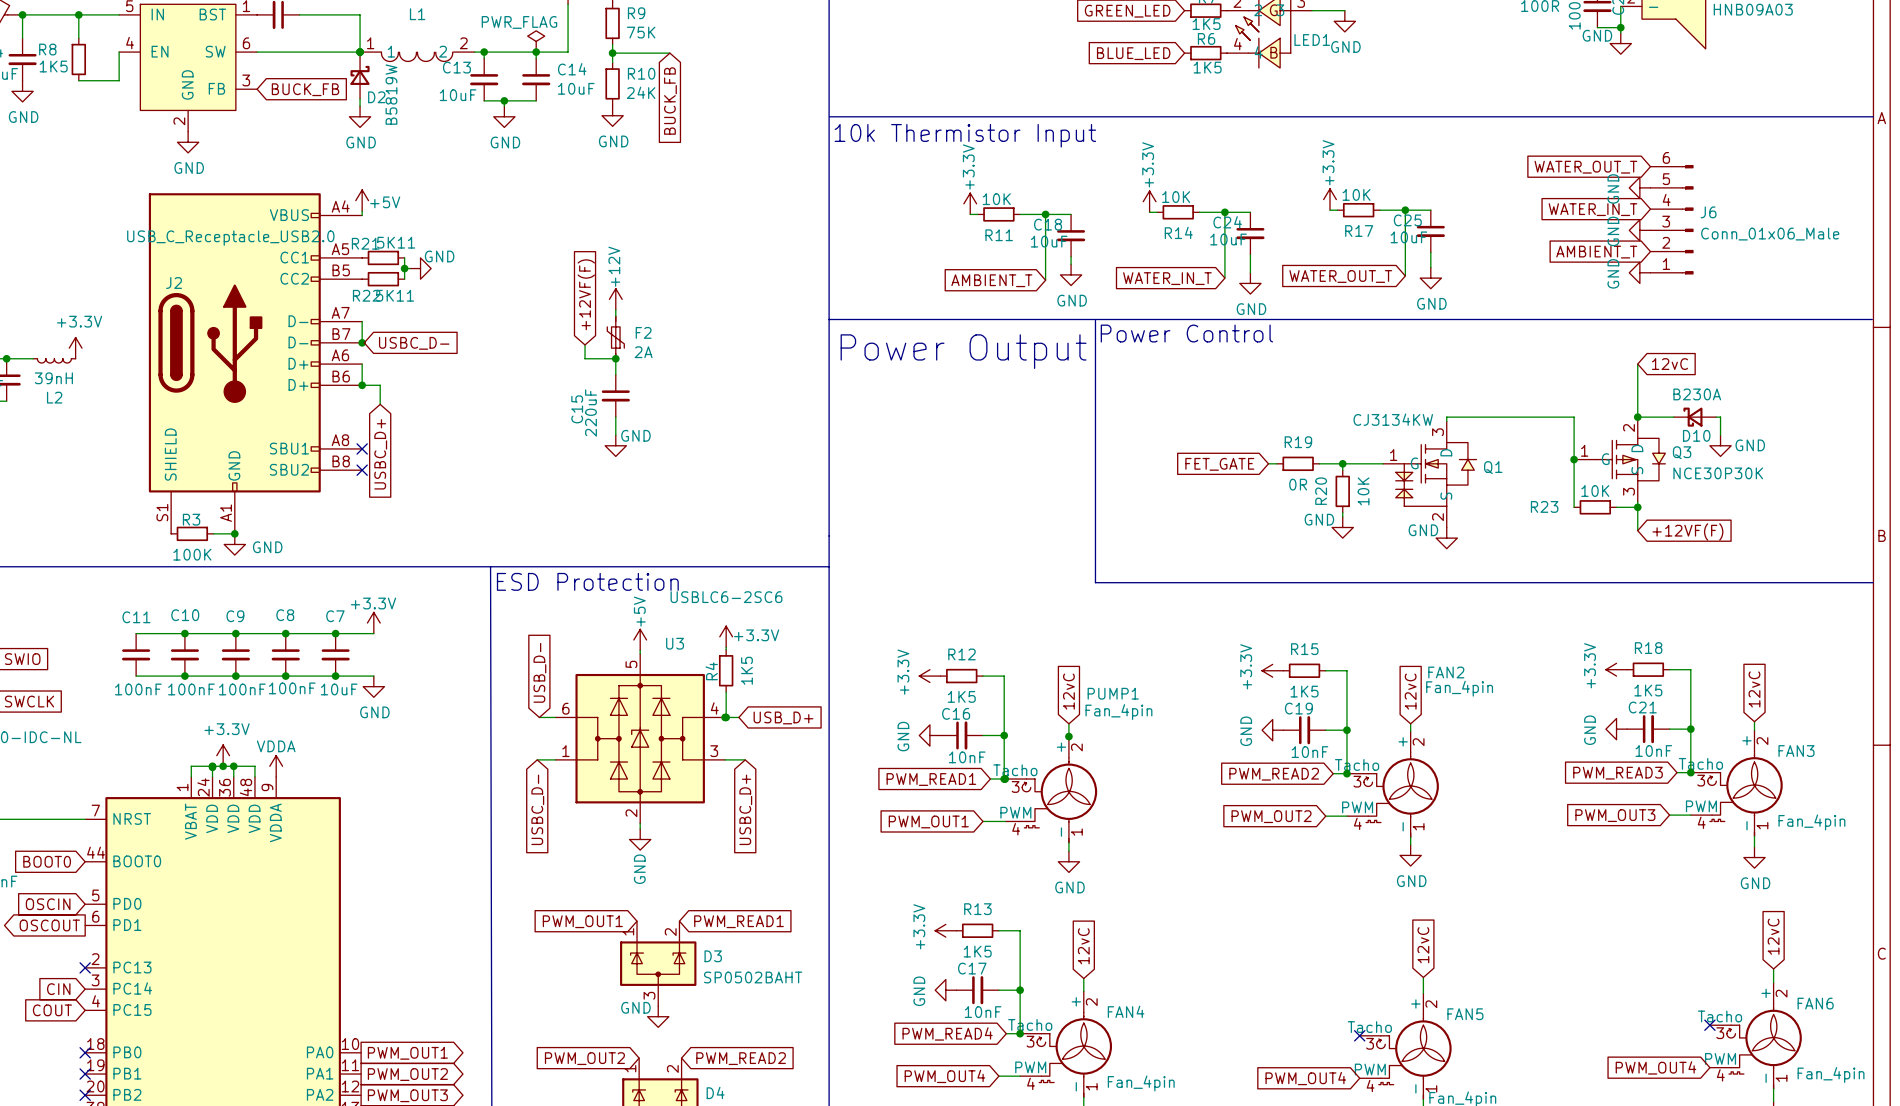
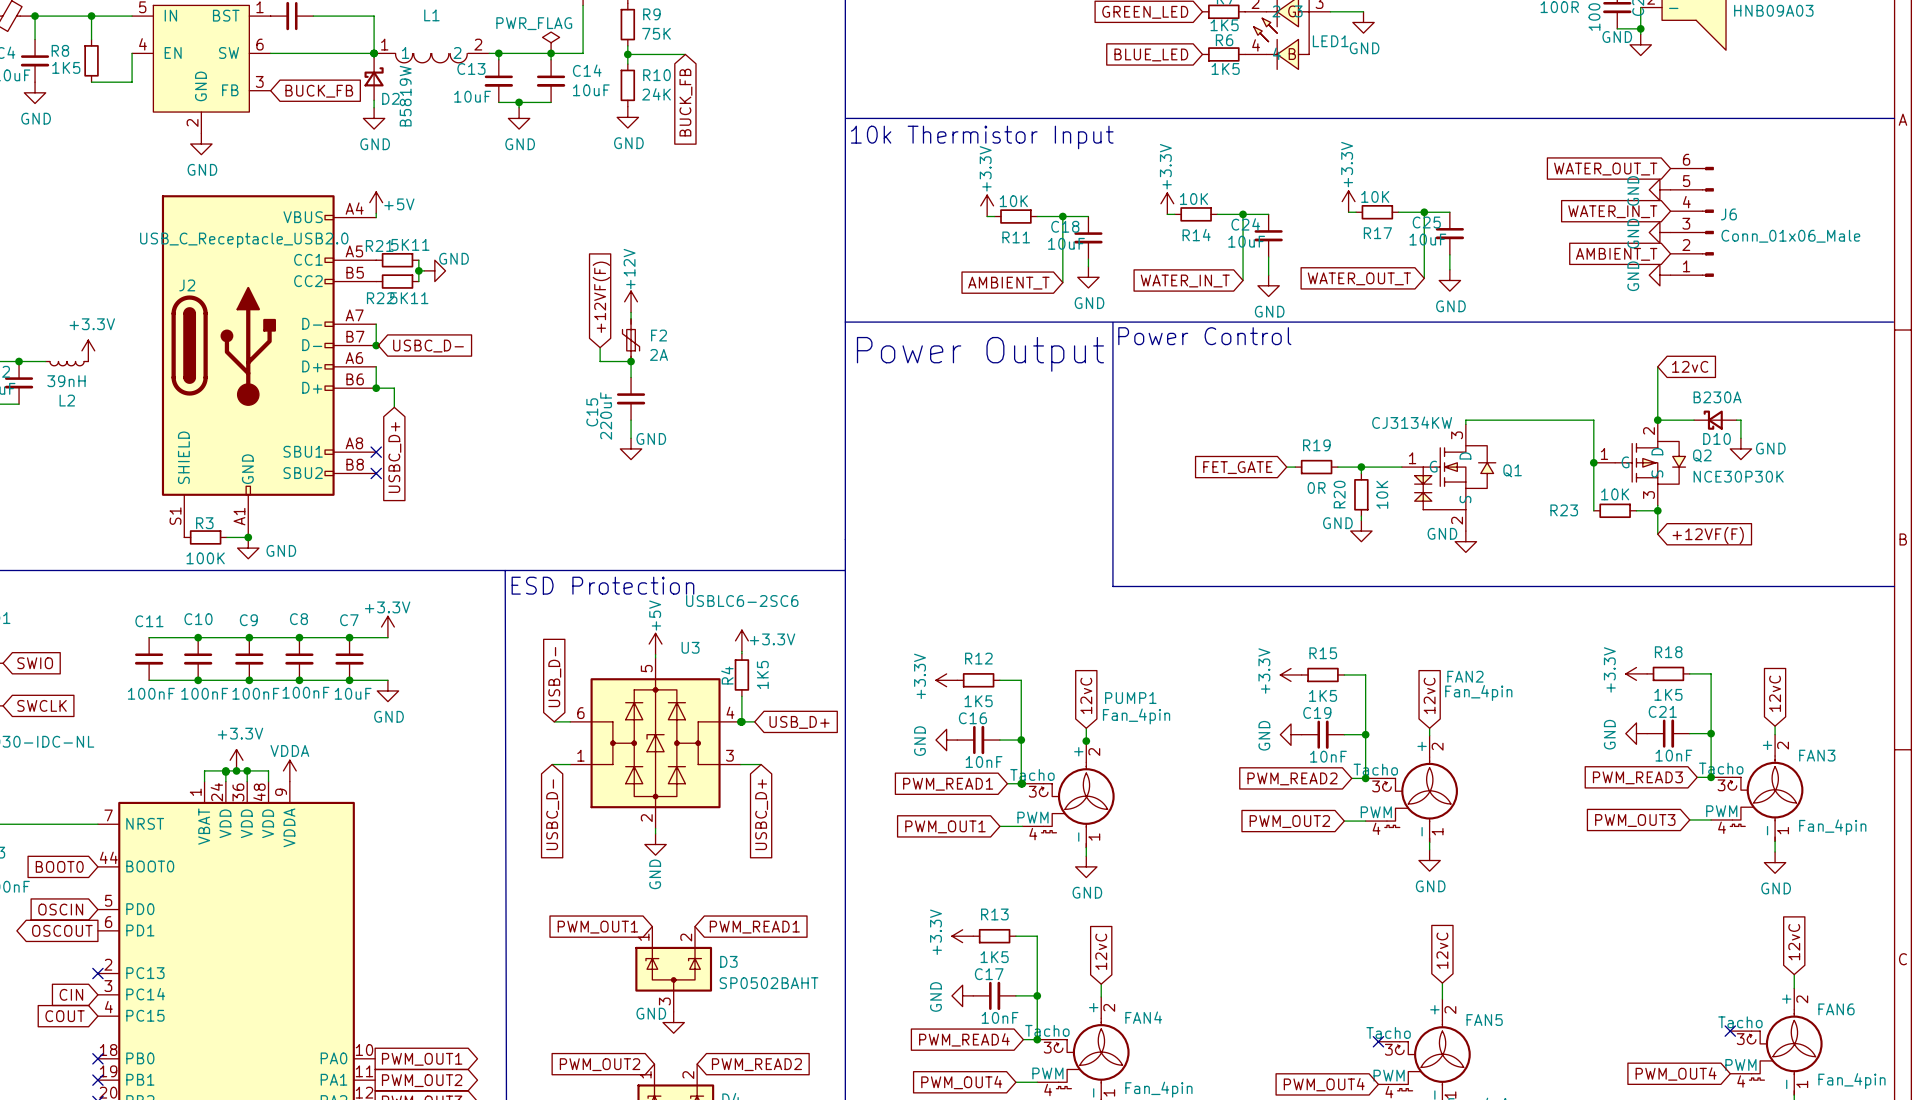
Q3 name: Q3 (1682, 452) -> Q2 (1702, 455)

